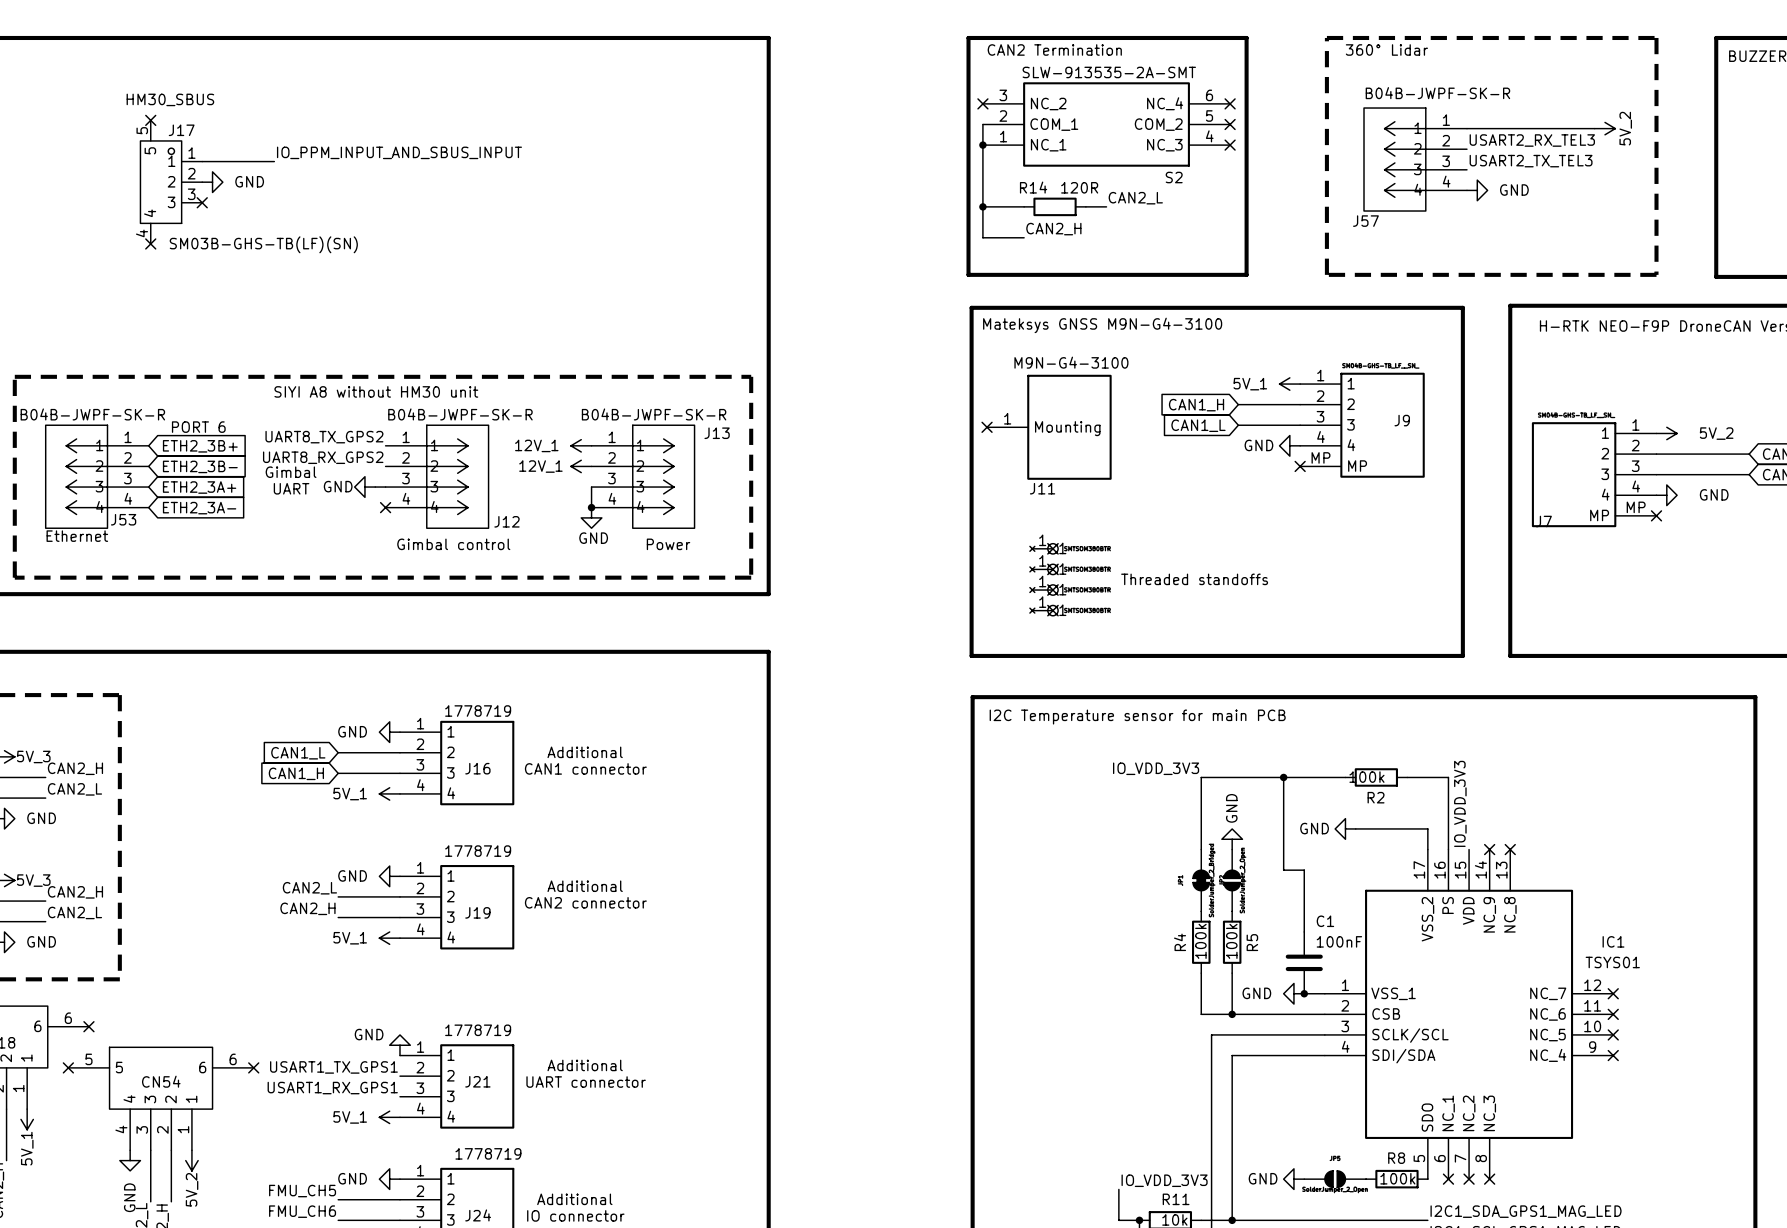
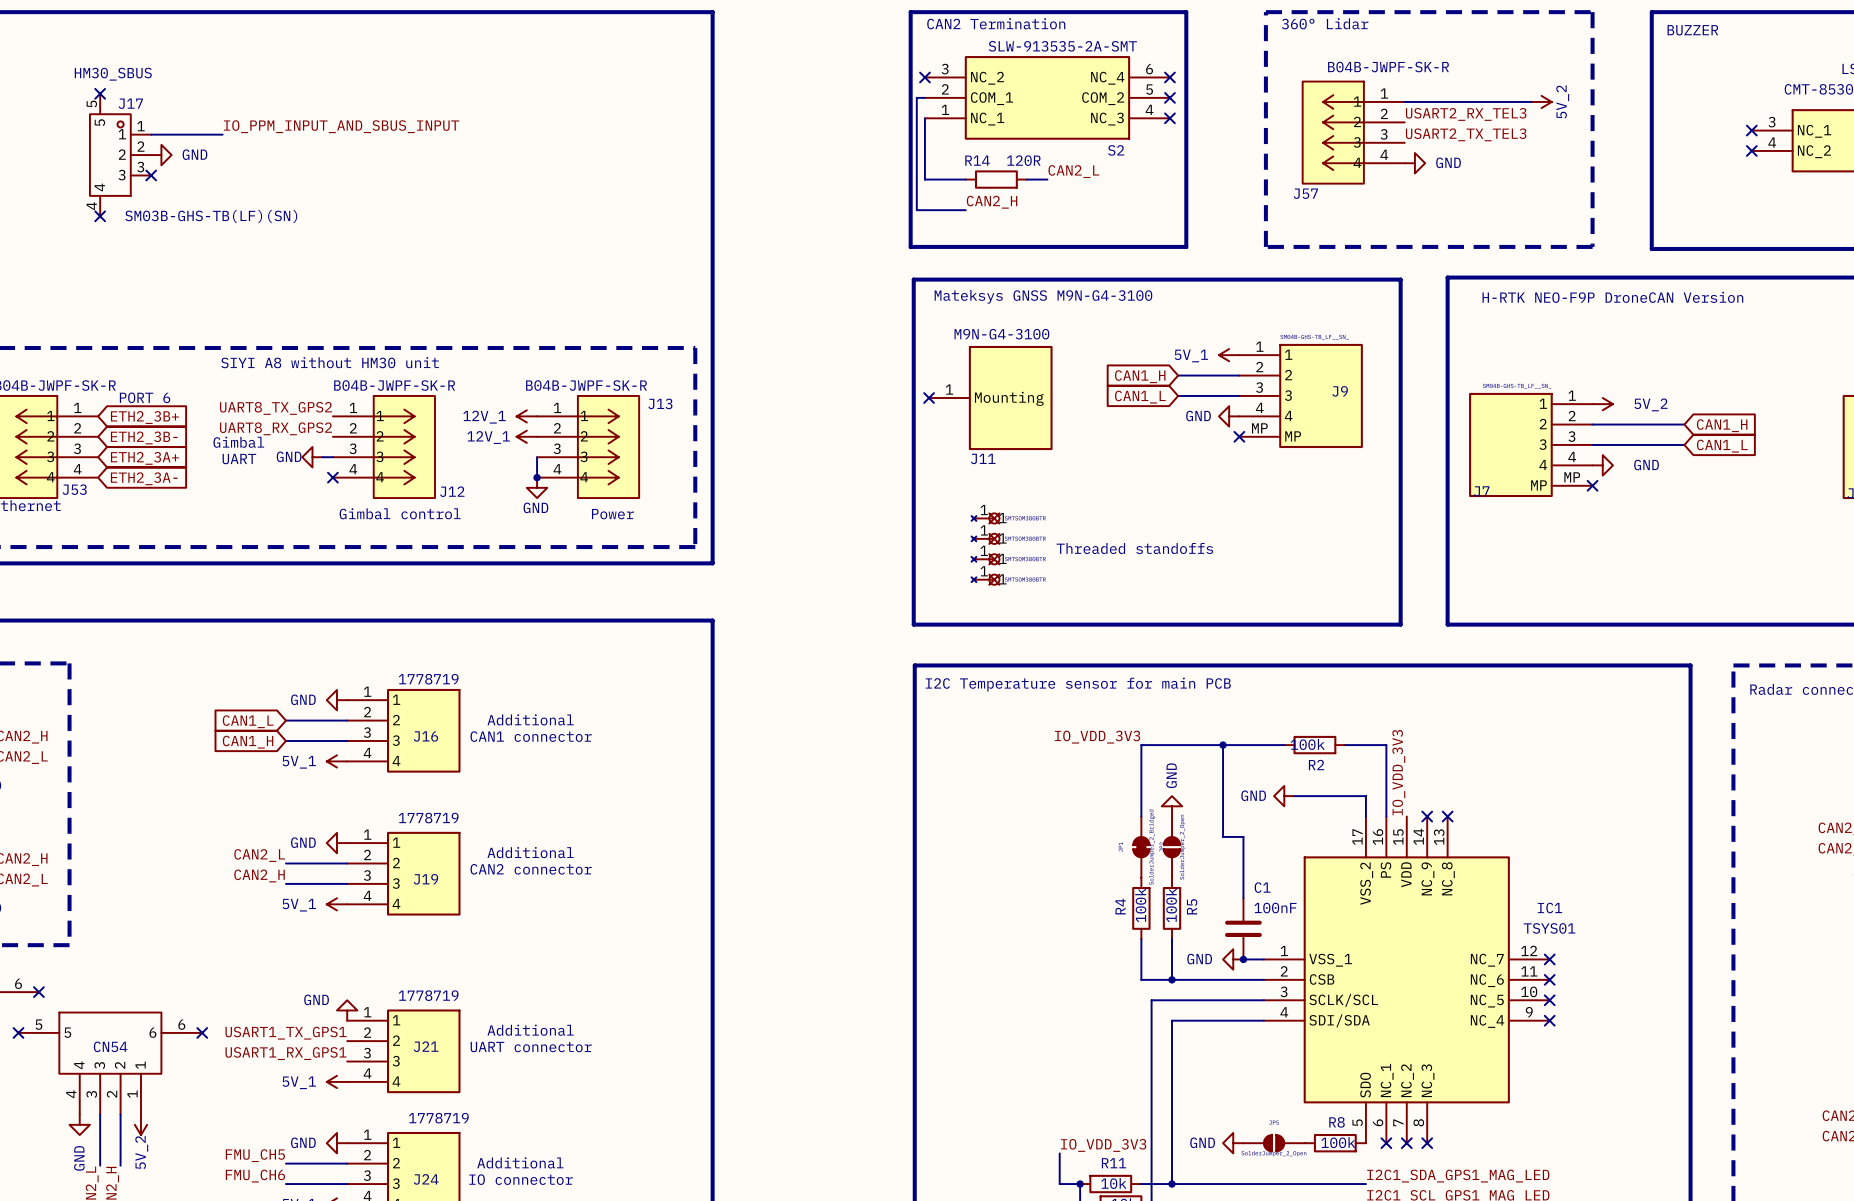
wire: (982, 124) (982, 145) -> none
junction: (982, 145) -> none
wire: (982, 206) (982, 237) -> (924, 97) (916, 97) (916, 210) (924, 210)
junction: (982, 206) -> none

